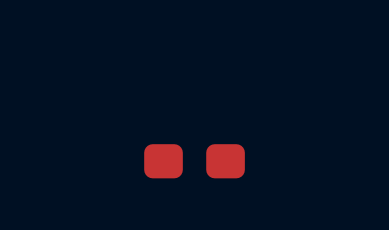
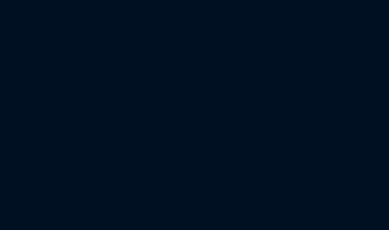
part: (194, 161) -> none

